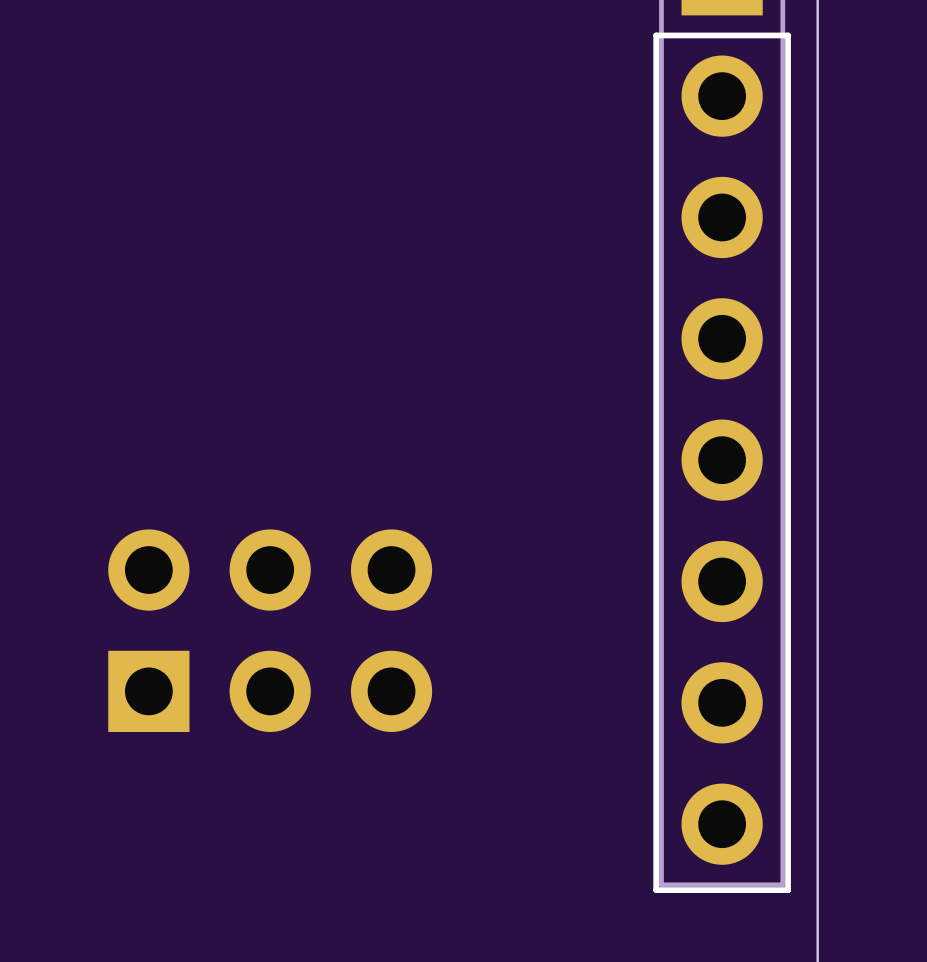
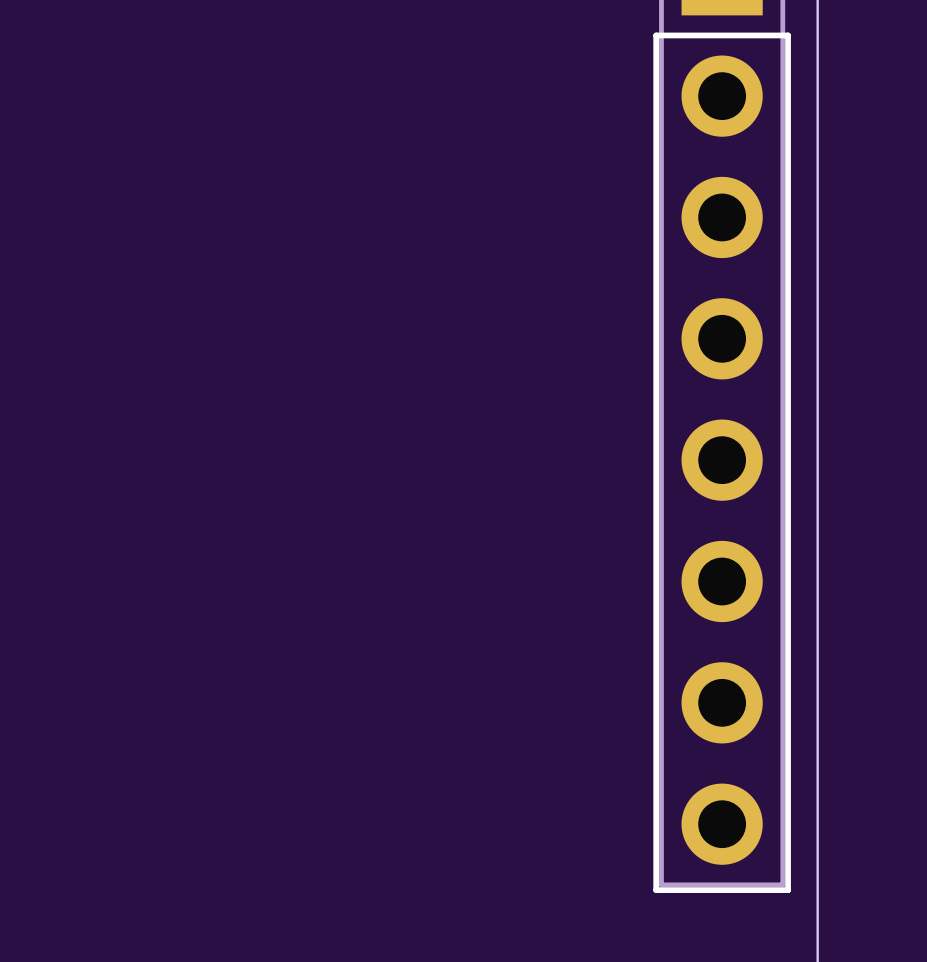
part: (270, 630) -> none

